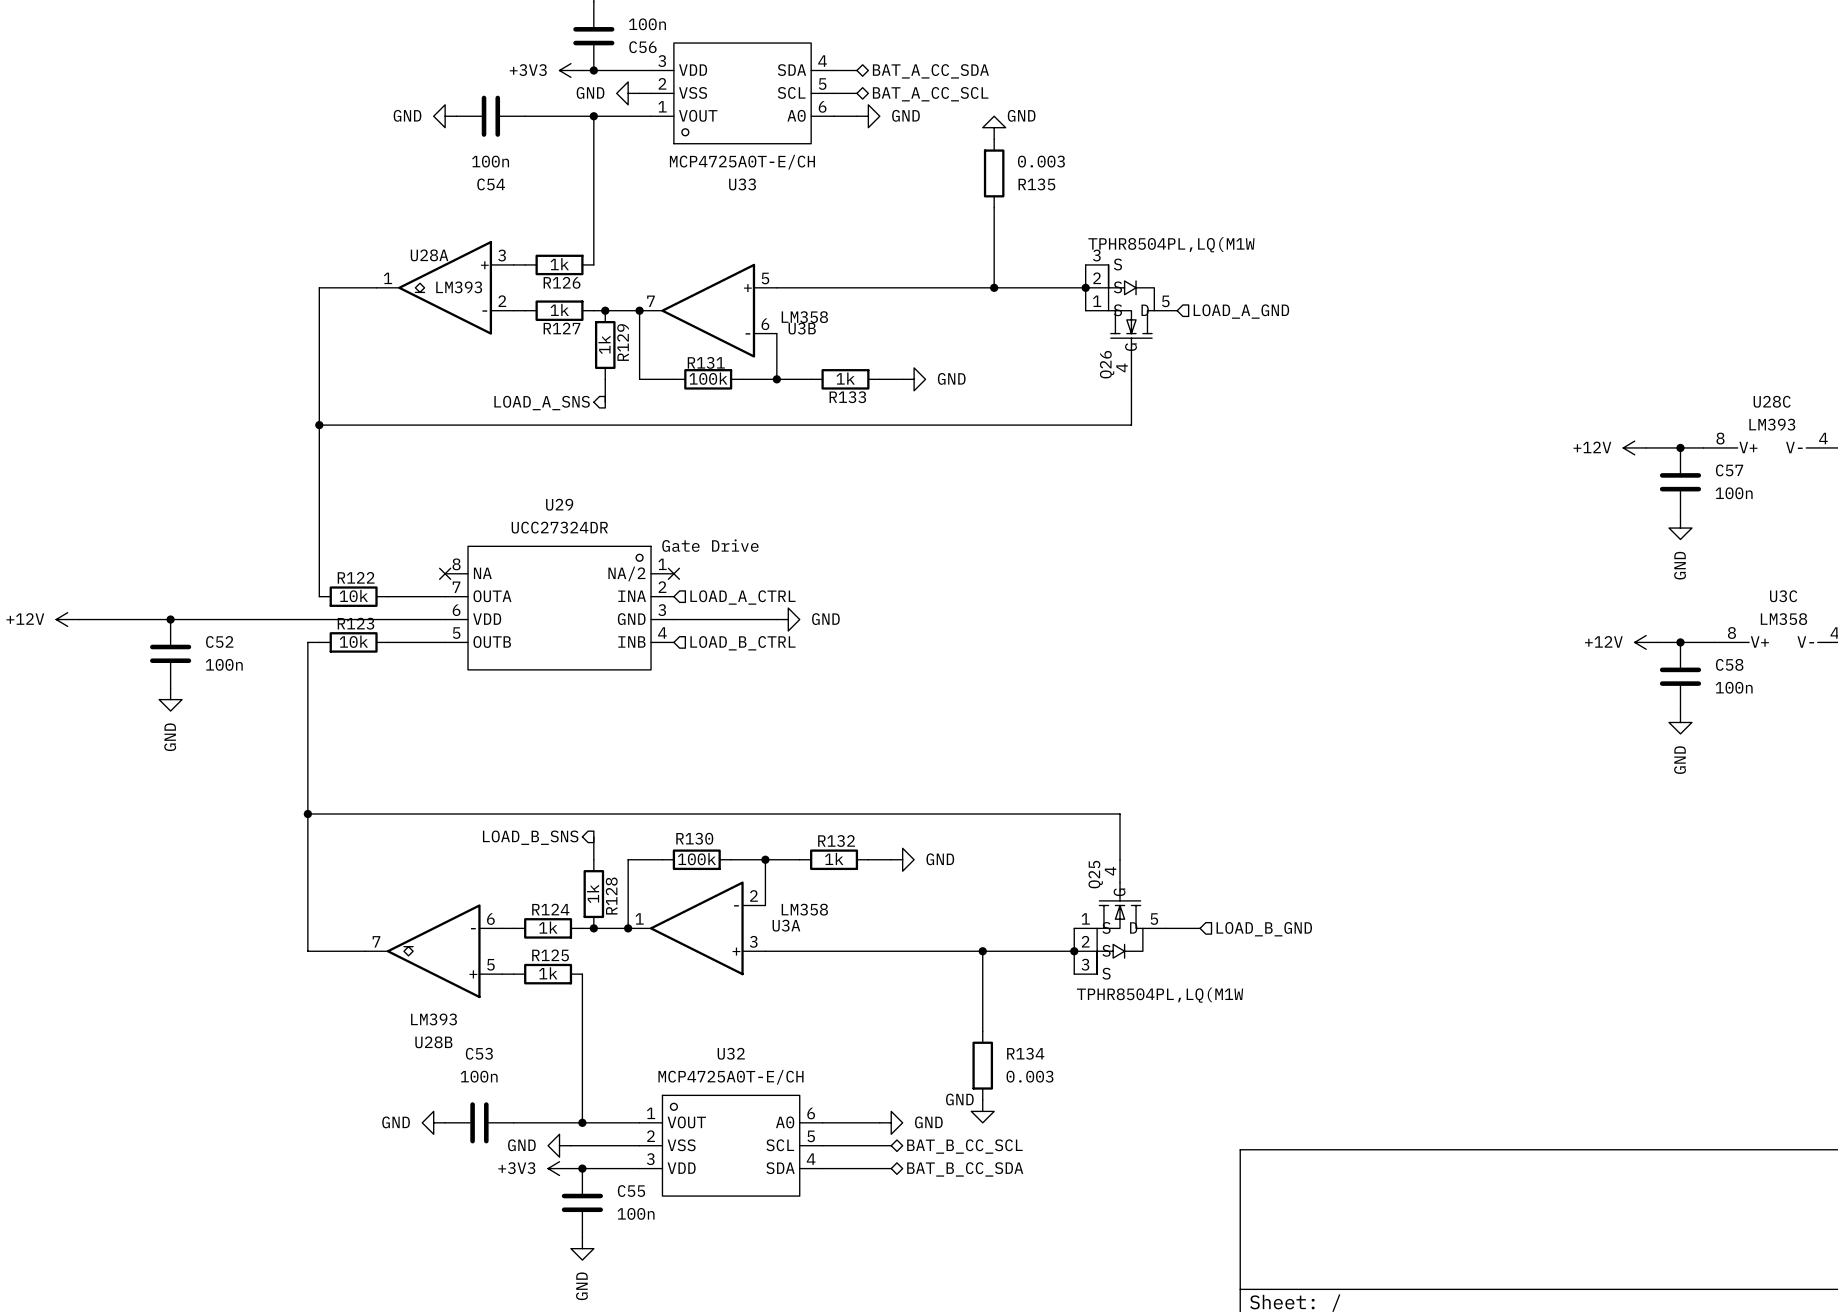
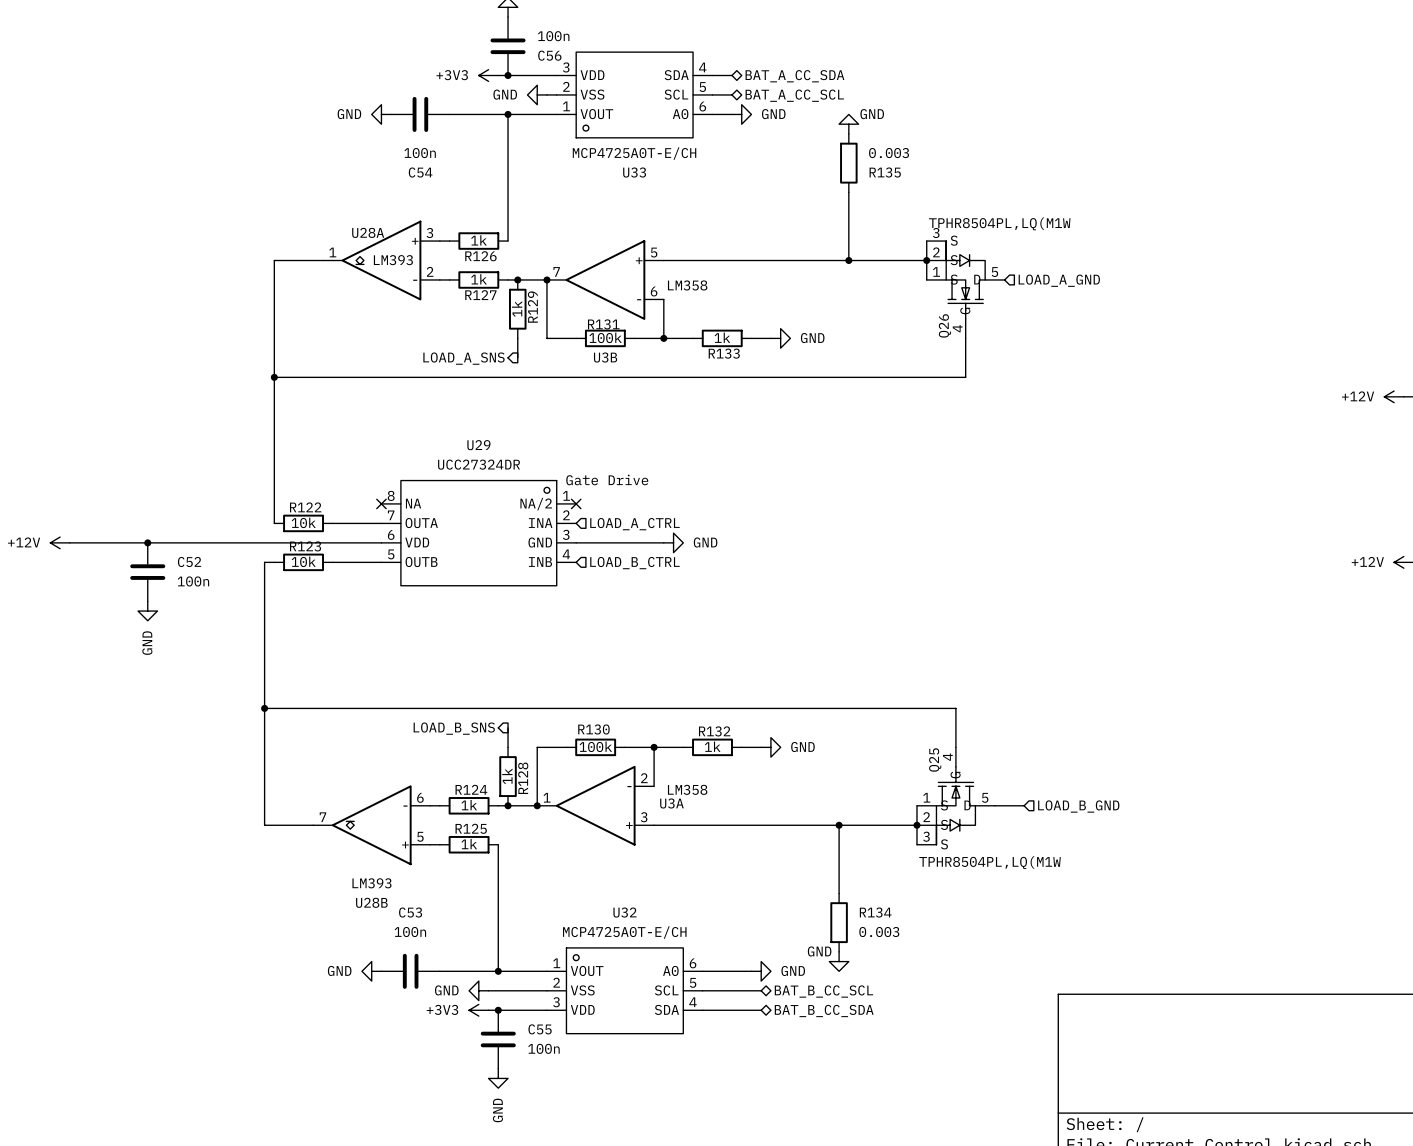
U3B name position: U3B (802, 328) -> U3B (605, 357)

